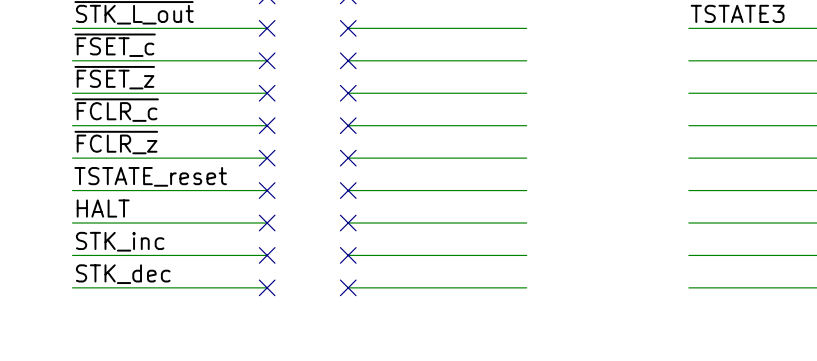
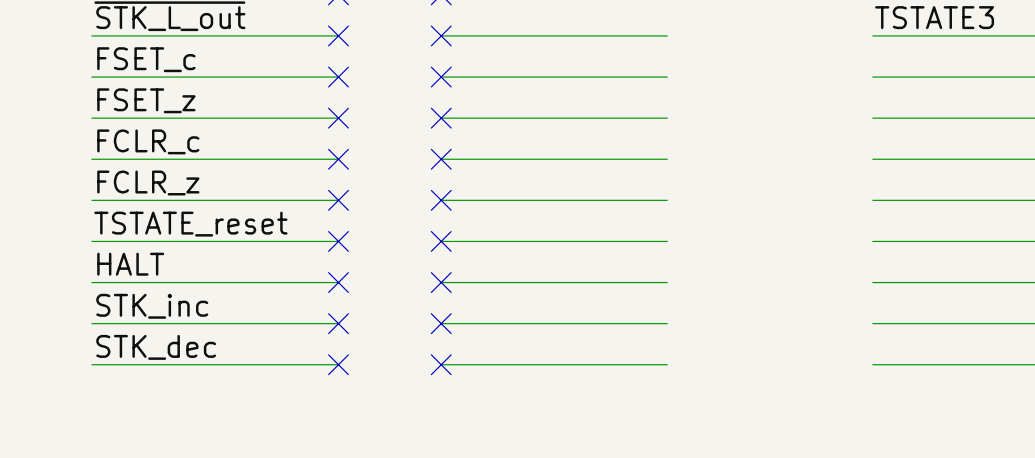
label: ~{FSET_c} (115, 45) -> FSET_c (146, 59)
label: ~{FSET_z} (114, 77) -> FSET_z (146, 100)
label: ~{FCLR_c} (116, 110) -> FCLR_c (148, 141)
label: ~{FCLR_z} (116, 142) -> FCLR_z (148, 182)

